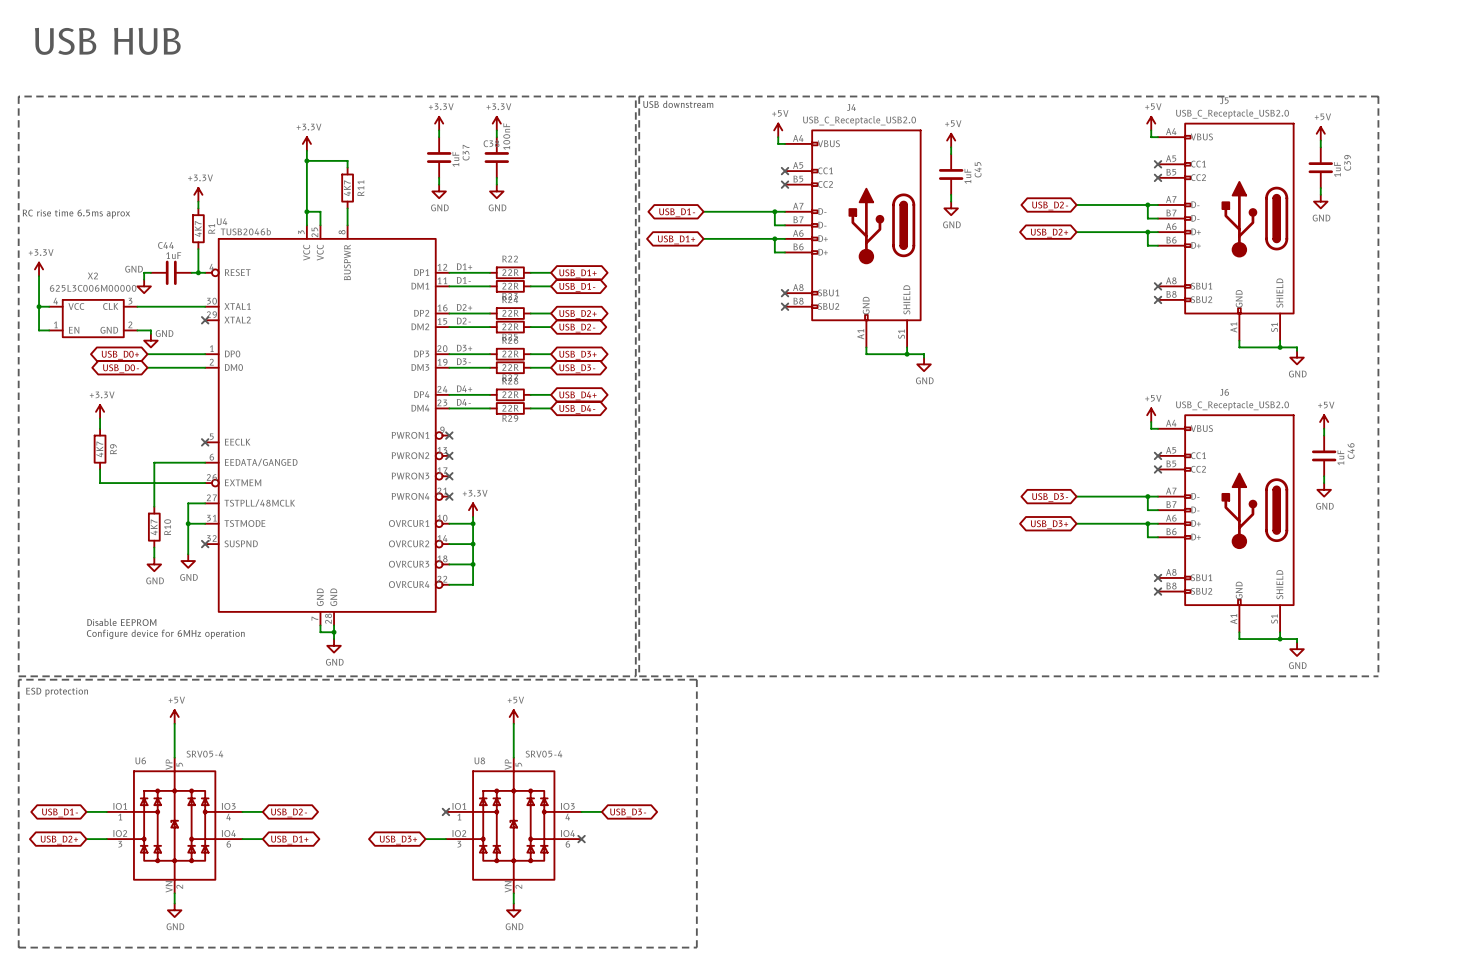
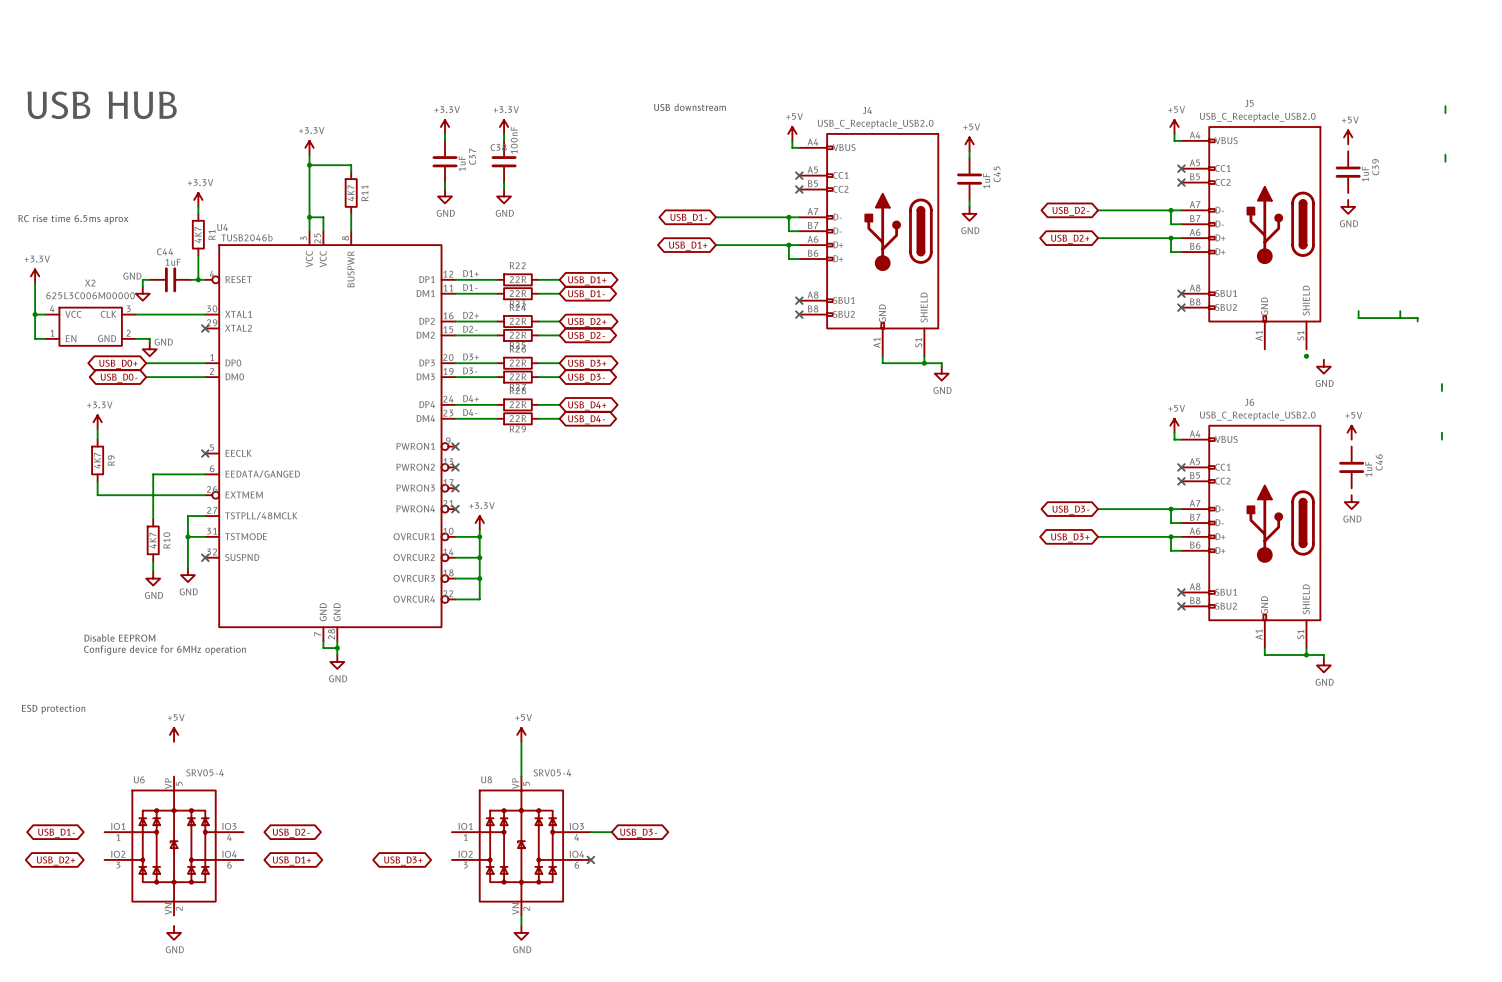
text position: USB HUB (107, 41) -> USB HUB (102, 105)
line: (18, 96) (18, 676) (635, 676) (635, 96) (18, 96) -> none
line: (639, 96) (1378, 96) (1378, 676) (639, 676) (639, 96) -> none
wire: (1320, 140) (1320, 147) -> (1445, 106) (1445, 113)
wire: (1320, 188) (1320, 194) -> (1445, 154) (1445, 161)
wire: (1239, 340) (1239, 347) (1297, 347) (1297, 350) -> (1358, 311) (1358, 318) (1417, 318) (1417, 321)
wire: (1280, 340) (1280, 347) -> (1400, 311) (1400, 318)
wire: (1324, 428) (1324, 435) -> (1441, 384) (1441, 391)
wire: (1324, 476) (1324, 483) -> (1441, 432) (1441, 439)
line: (18, 679) (18, 947) (696, 947) (696, 679) (18, 679) -> none
wire: (174, 723) (174, 757) -> none
wire: (86, 811) (106, 811) -> none
wire: (242, 811) (262, 811) -> none
no-connect mark: (445, 811) -> none
wire: (86, 839) (106, 839) -> none
wire: (242, 839) (262, 839) -> none
wire: (425, 839) (445, 839) -> none
wire: (174, 893) (174, 903) -> none

